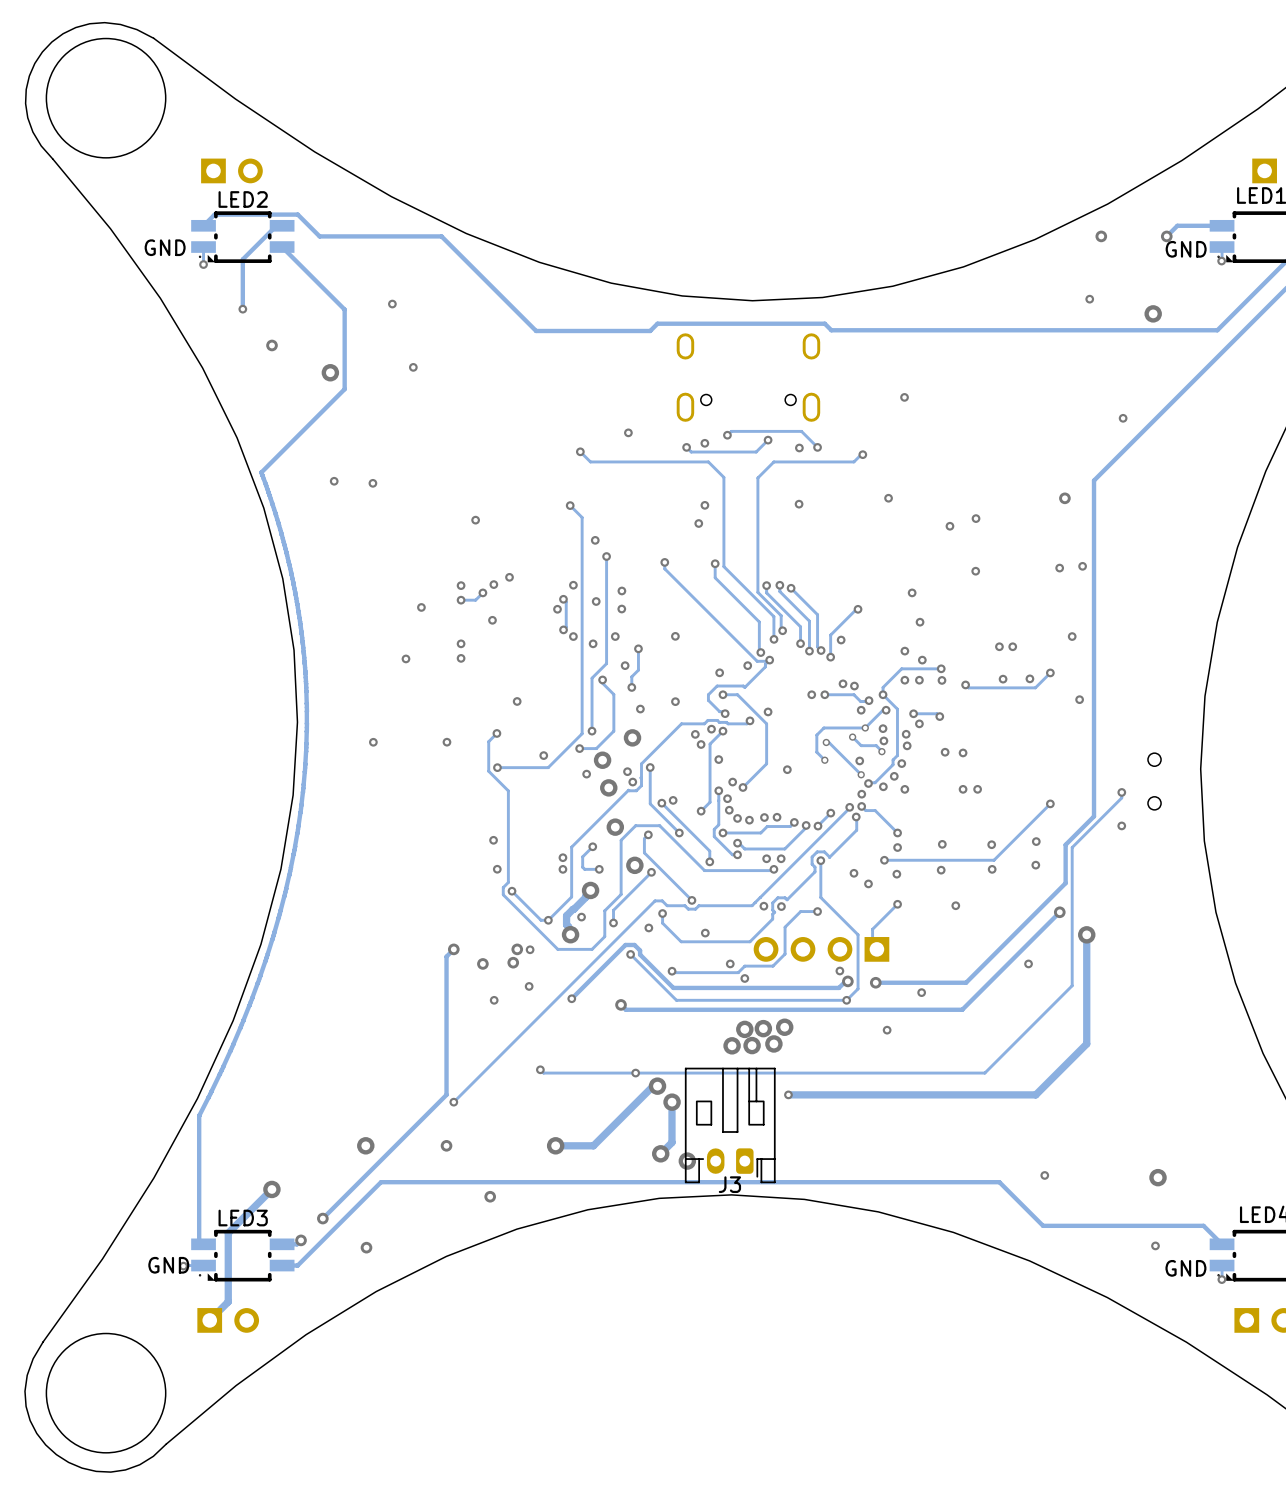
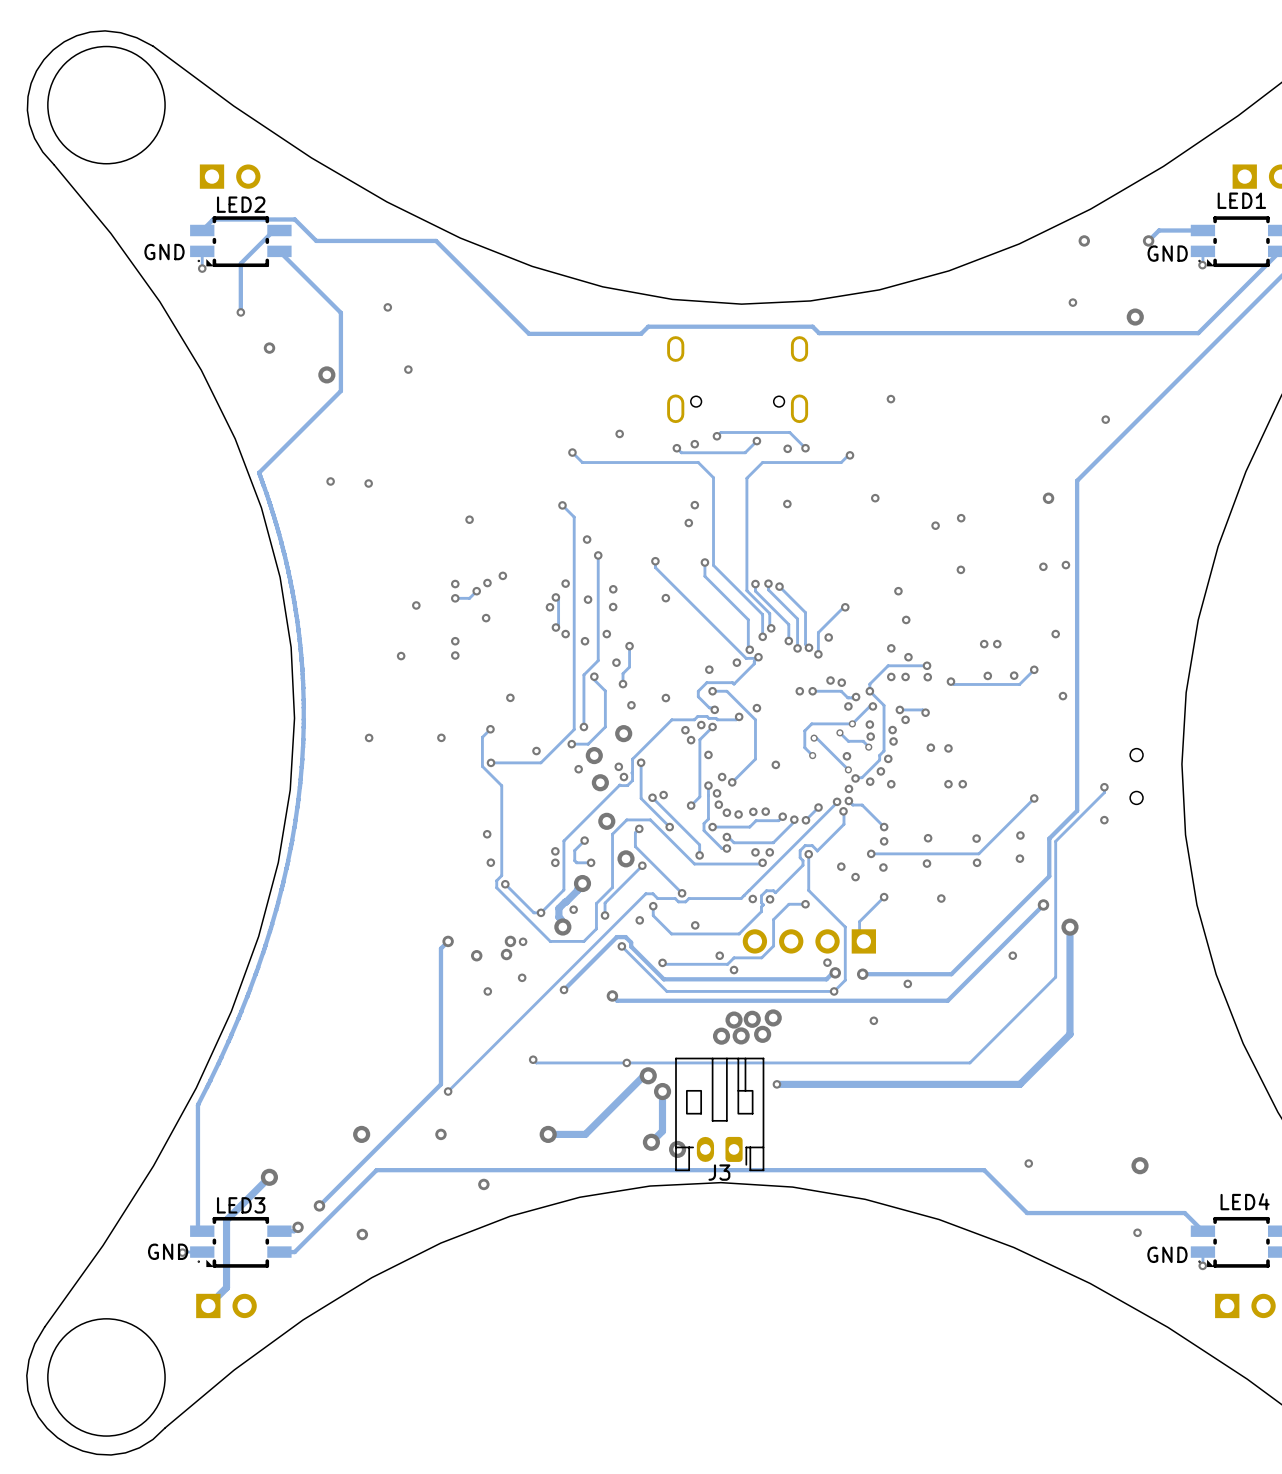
via position: (675, 636) -> (665, 598)

